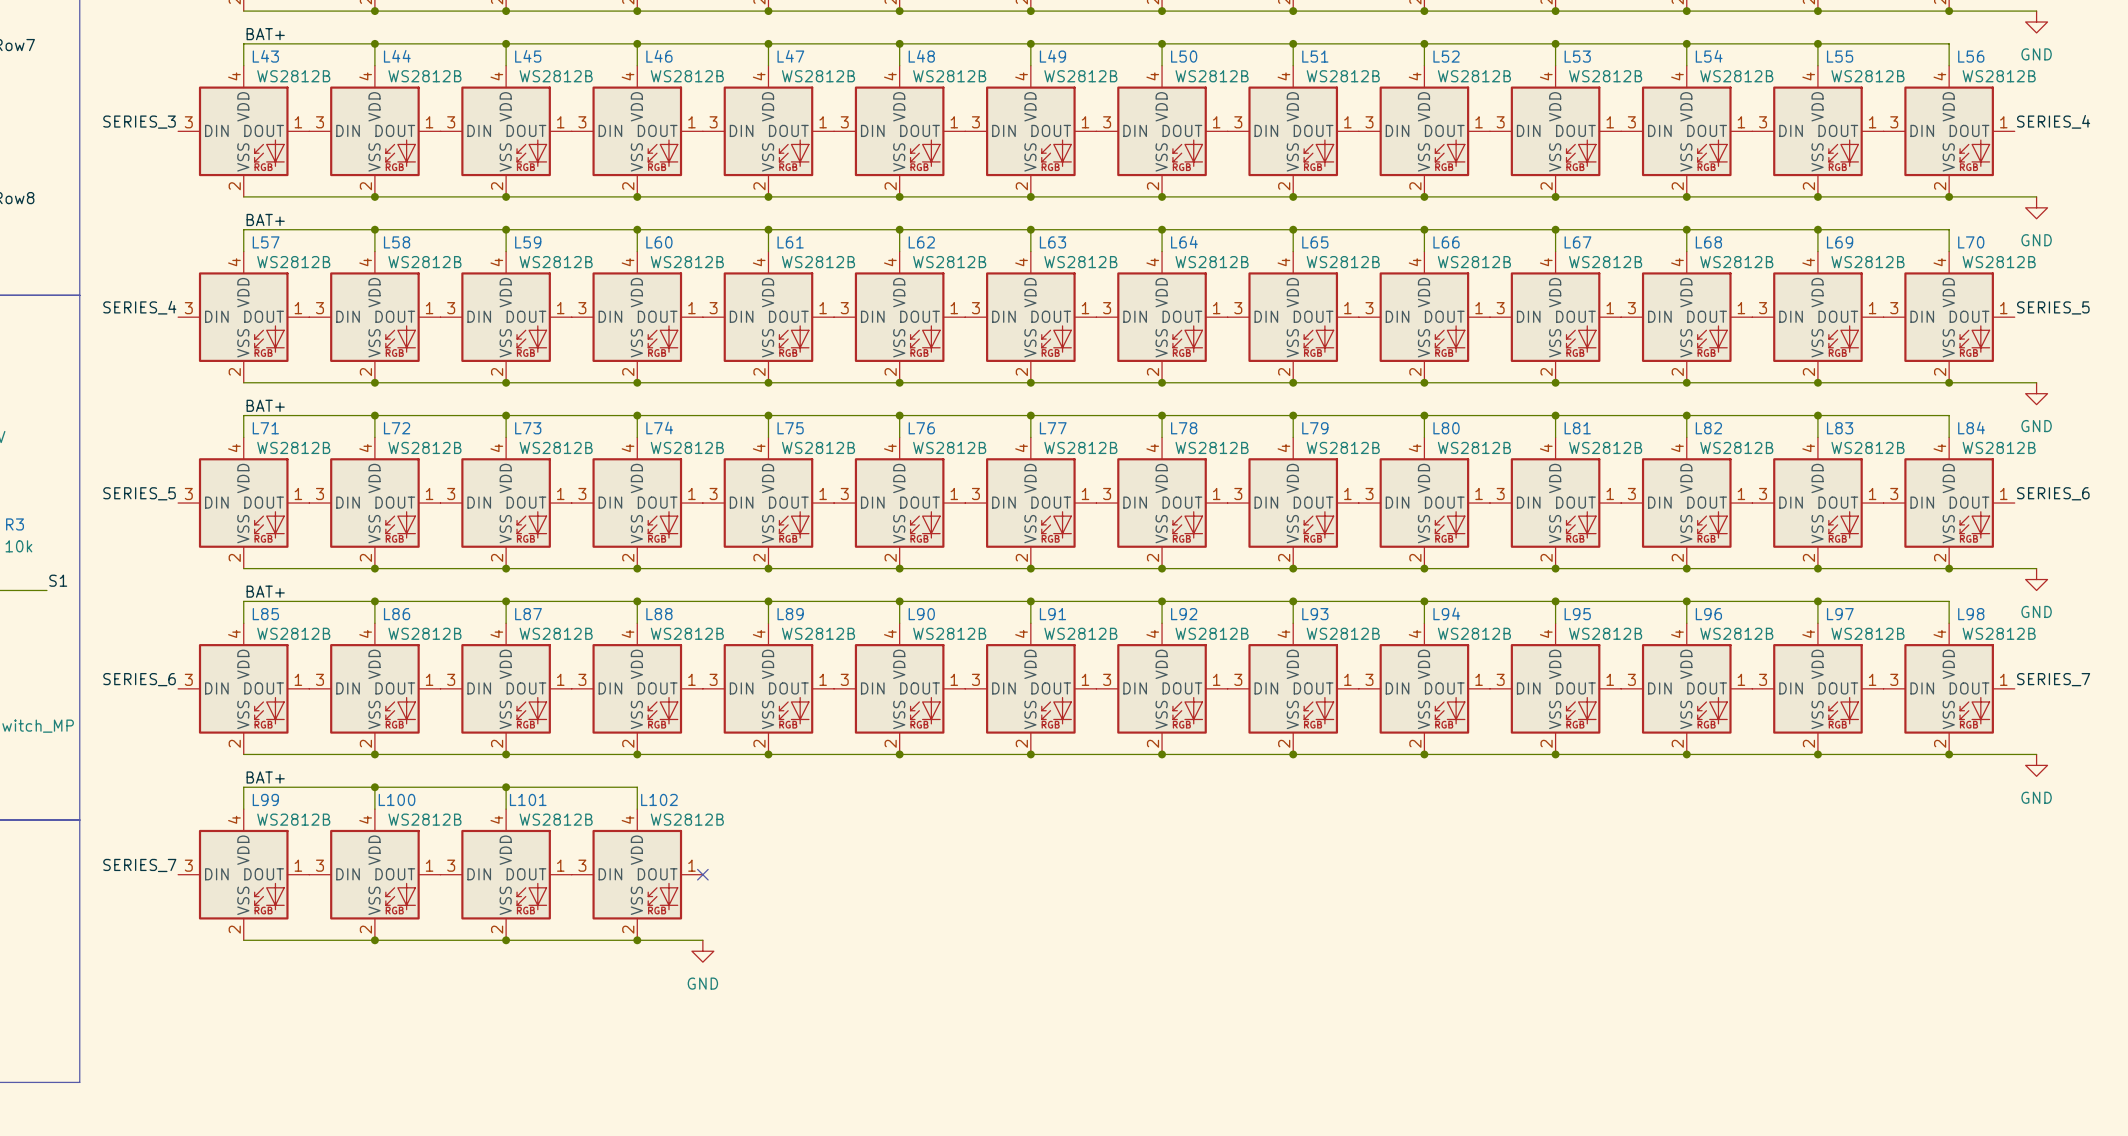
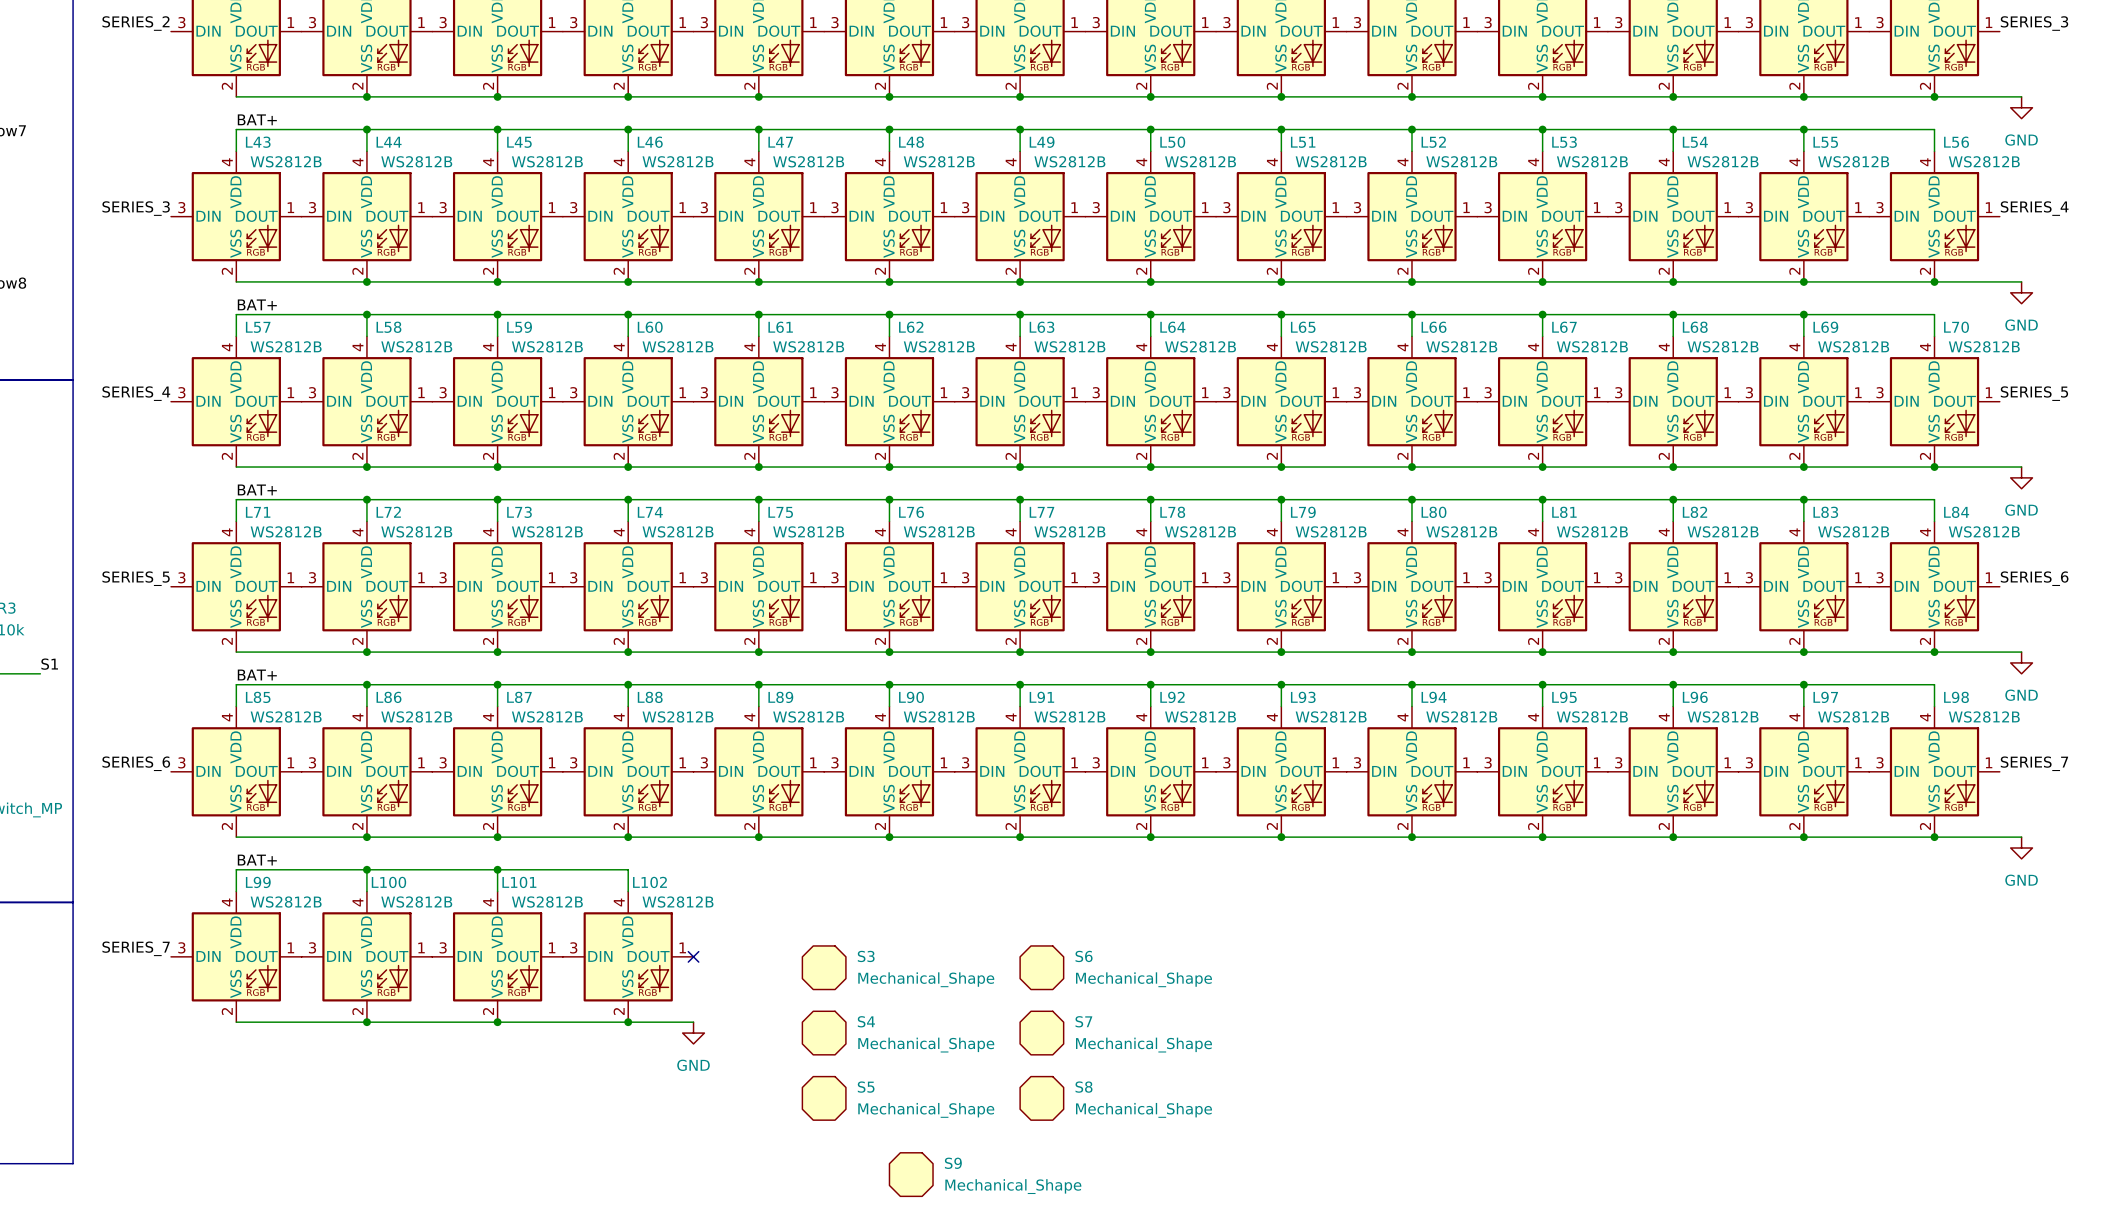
S3: none -> Mechanical_Shape (824, 967)
S6: none -> Mechanical_Shape (1041, 967)
S4: none -> Mechanical_Shape (824, 1033)
S7: none -> Mechanical_Shape (1041, 1033)
S5: none -> Mechanical_Shape (824, 1098)
S8: none -> Mechanical_Shape (1041, 1098)
S9: none -> Mechanical_Shape (911, 1174)

